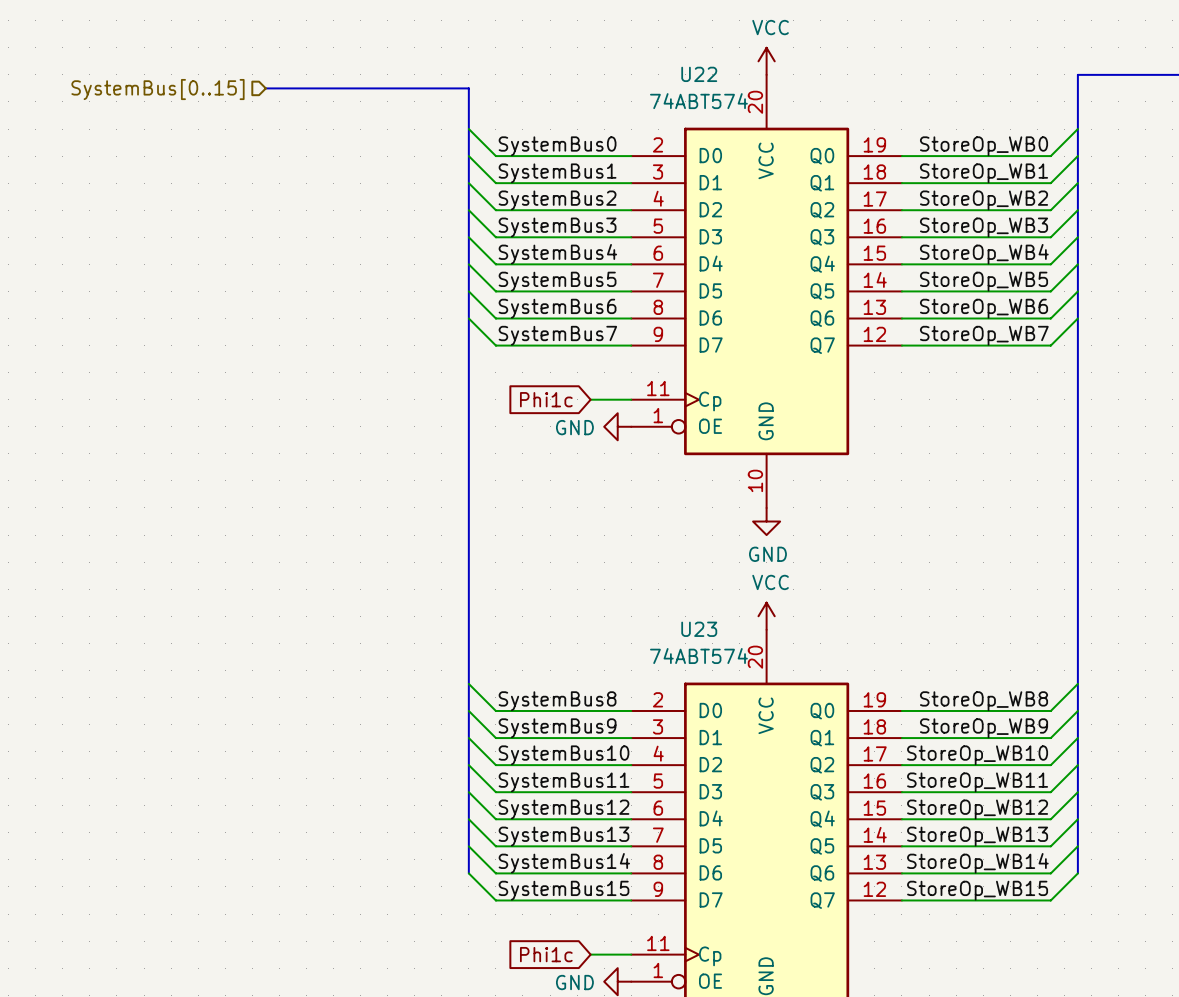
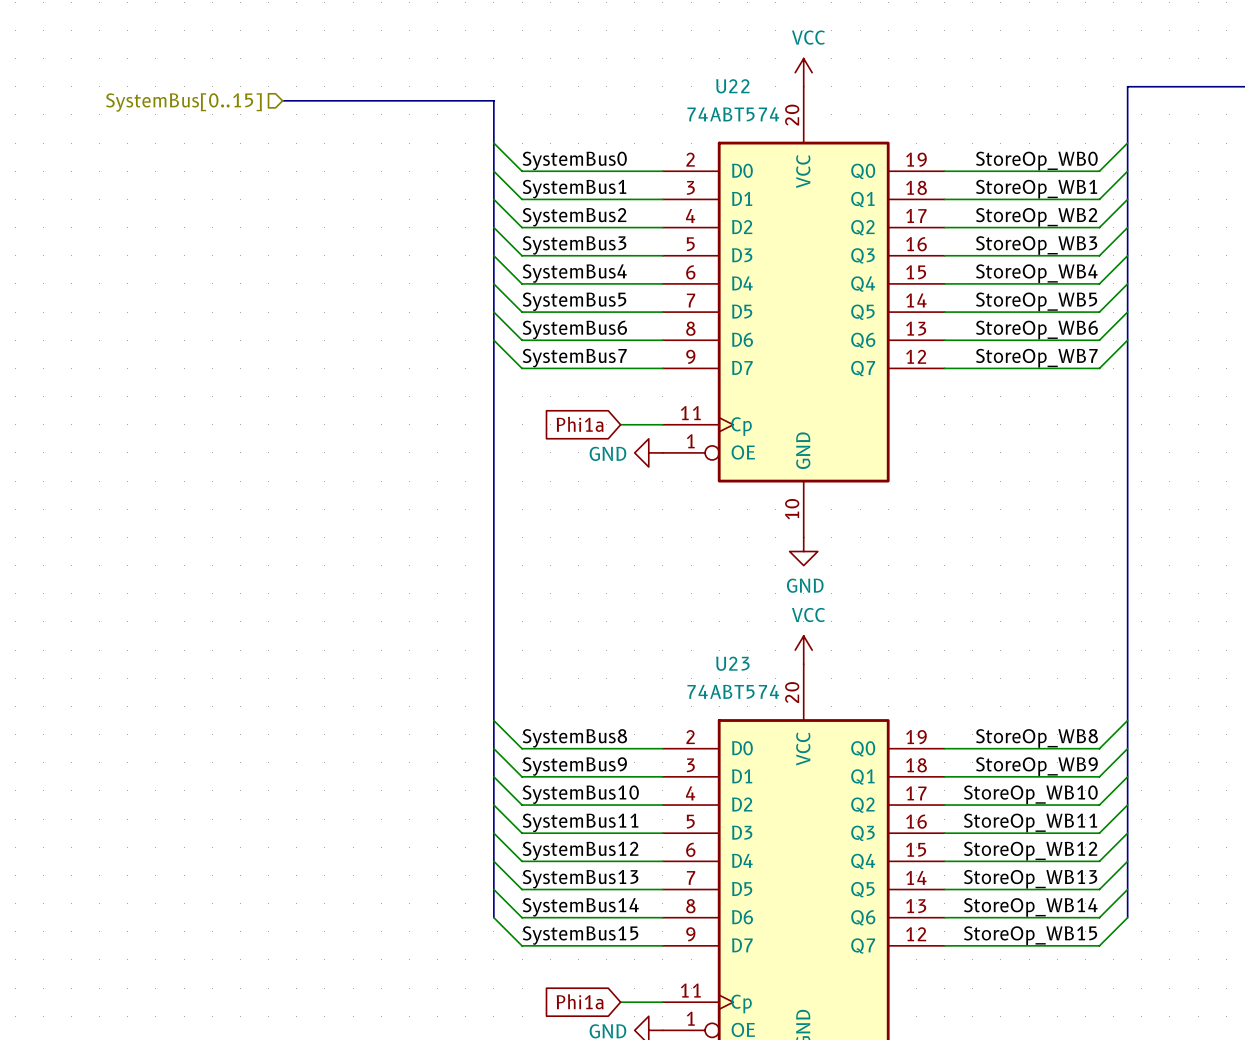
global label: Phi1c (546, 399) -> Phi1a (580, 424)
global label: Phi1c (546, 954) -> Phi1a (580, 1001)

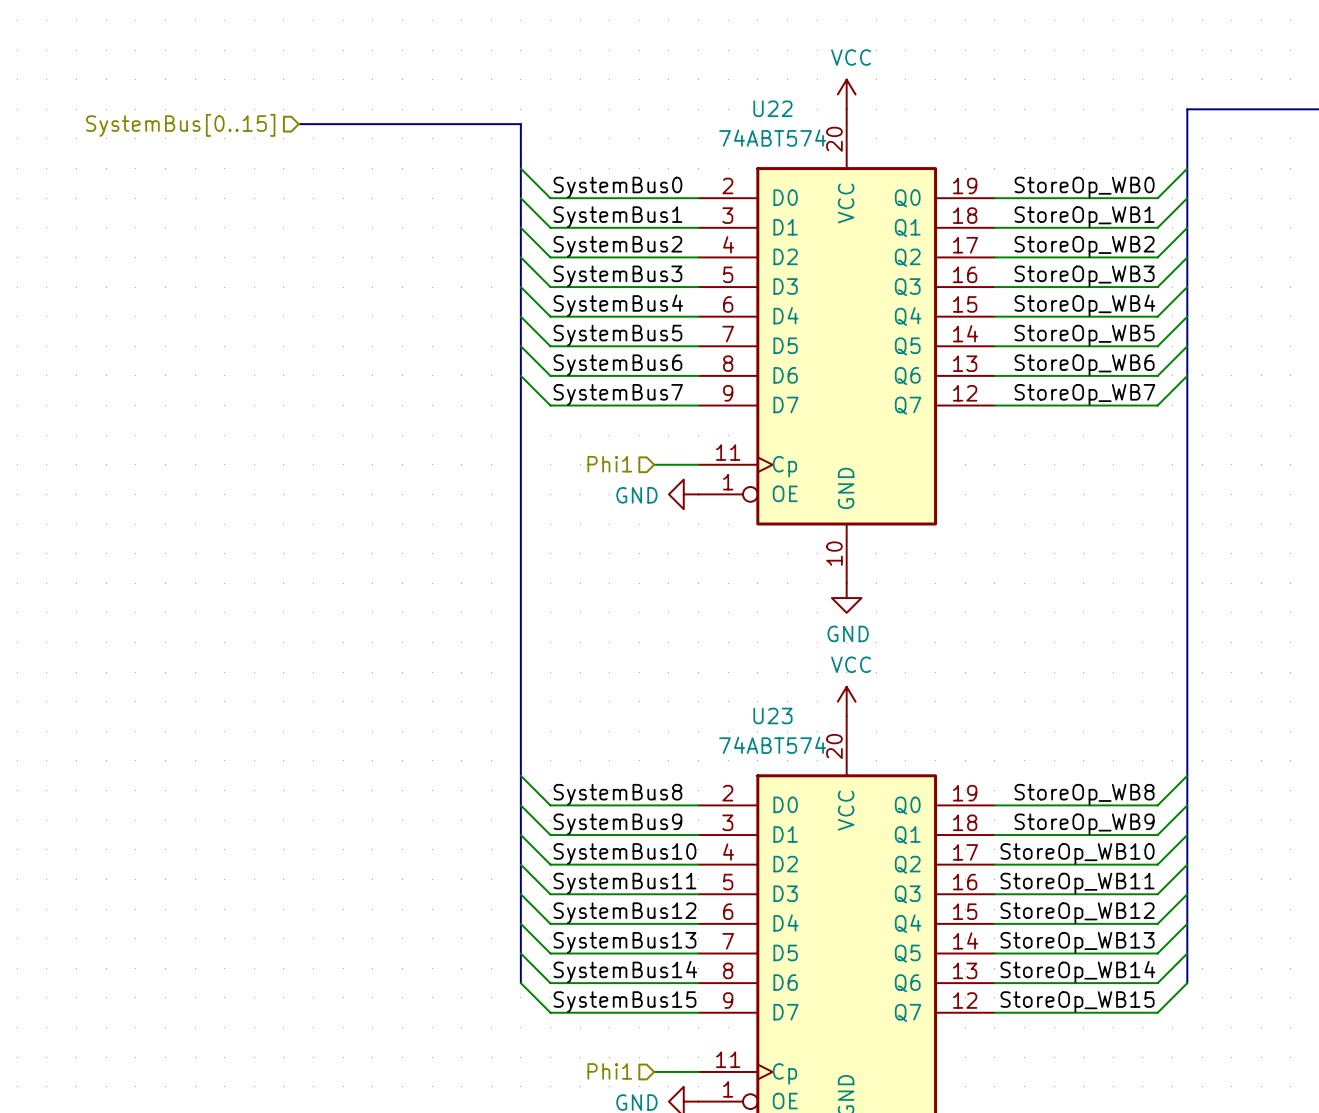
hierarchical label: none -> Phi1 (609, 464)
global label: Phi1a (580, 424) -> none
global label: Phi1a (580, 1001) -> none
hierarchical label: none -> Phi1 (609, 1071)

